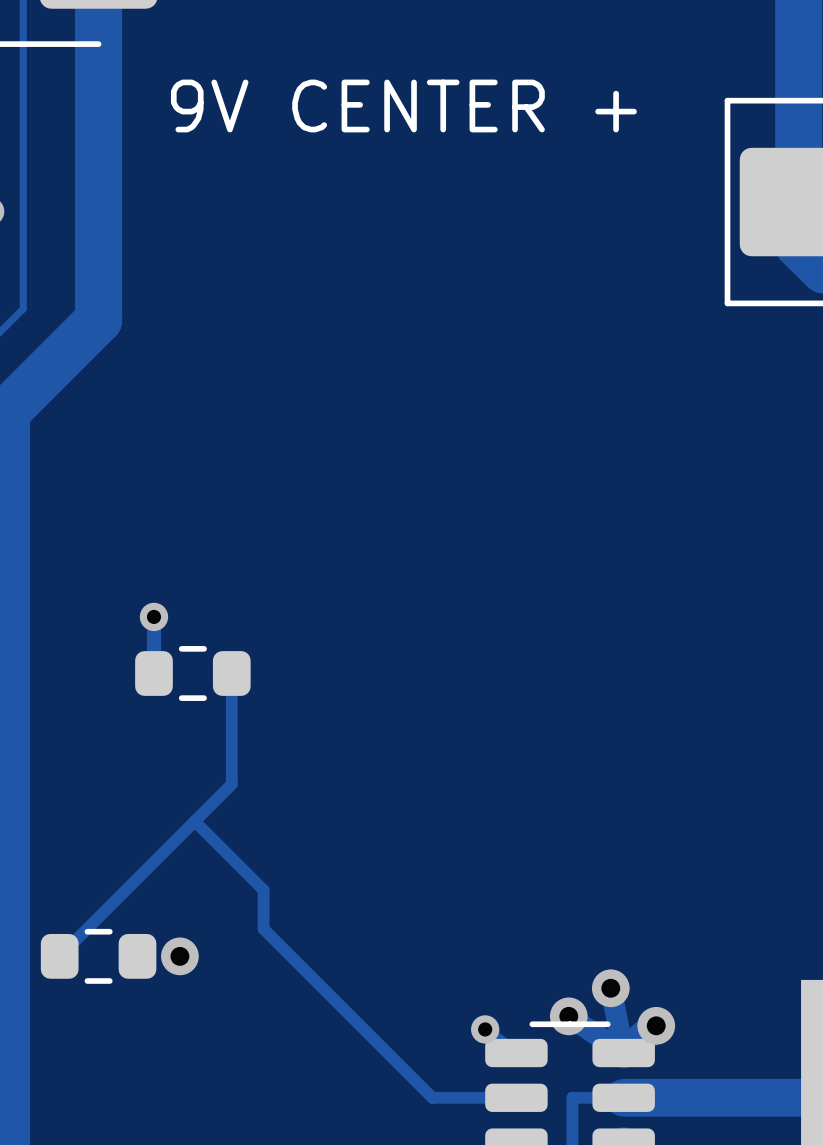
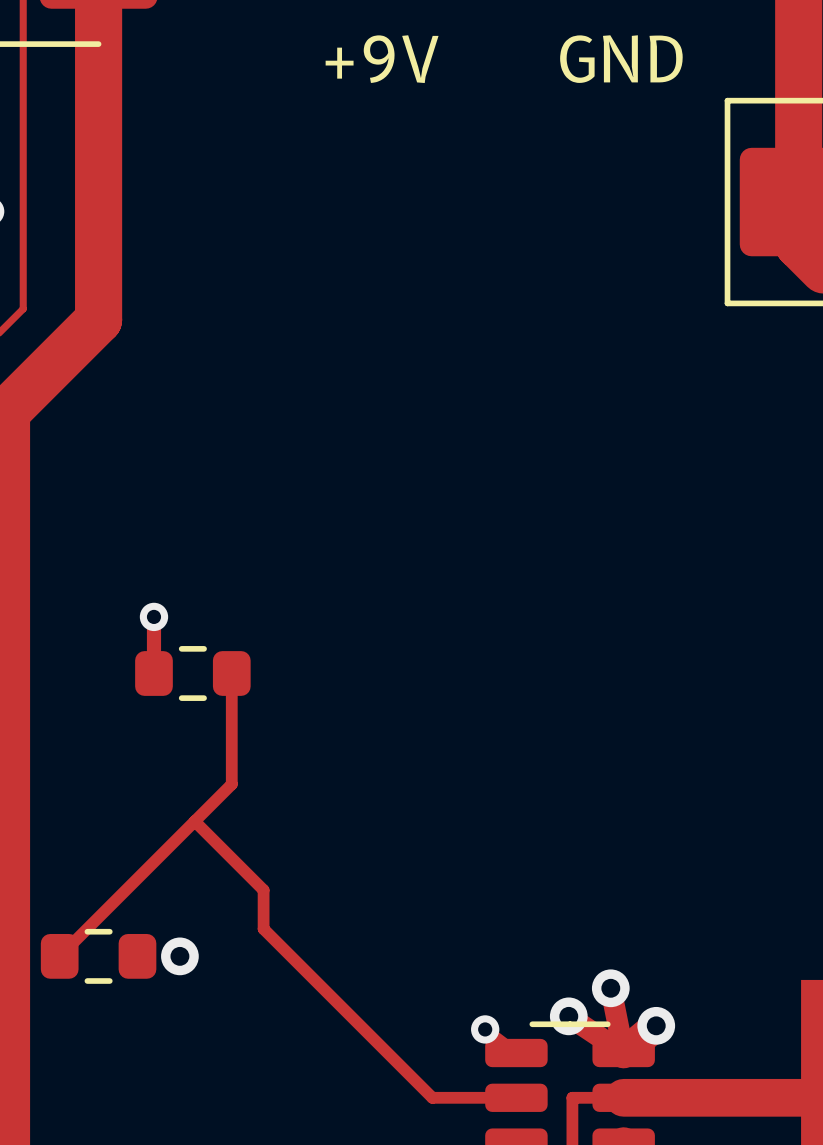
text: none -> +9V (382, 59)
text: none -> GND (621, 59)
text: 9V CENTER + (403, 105) -> none

